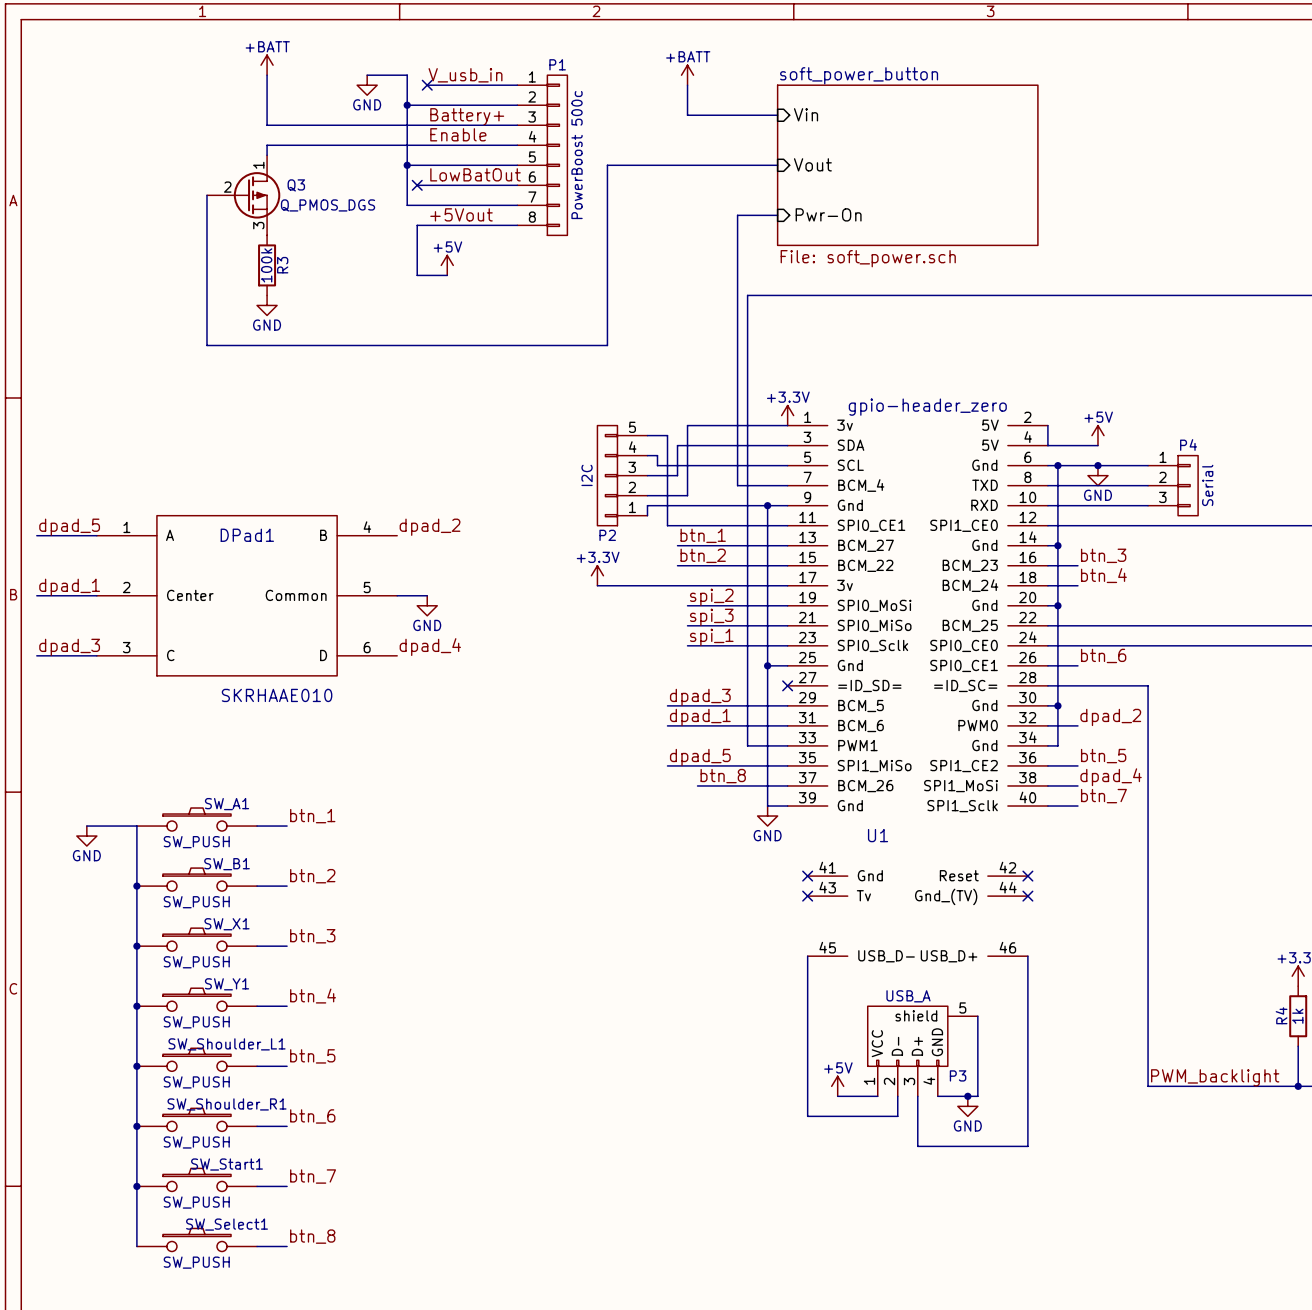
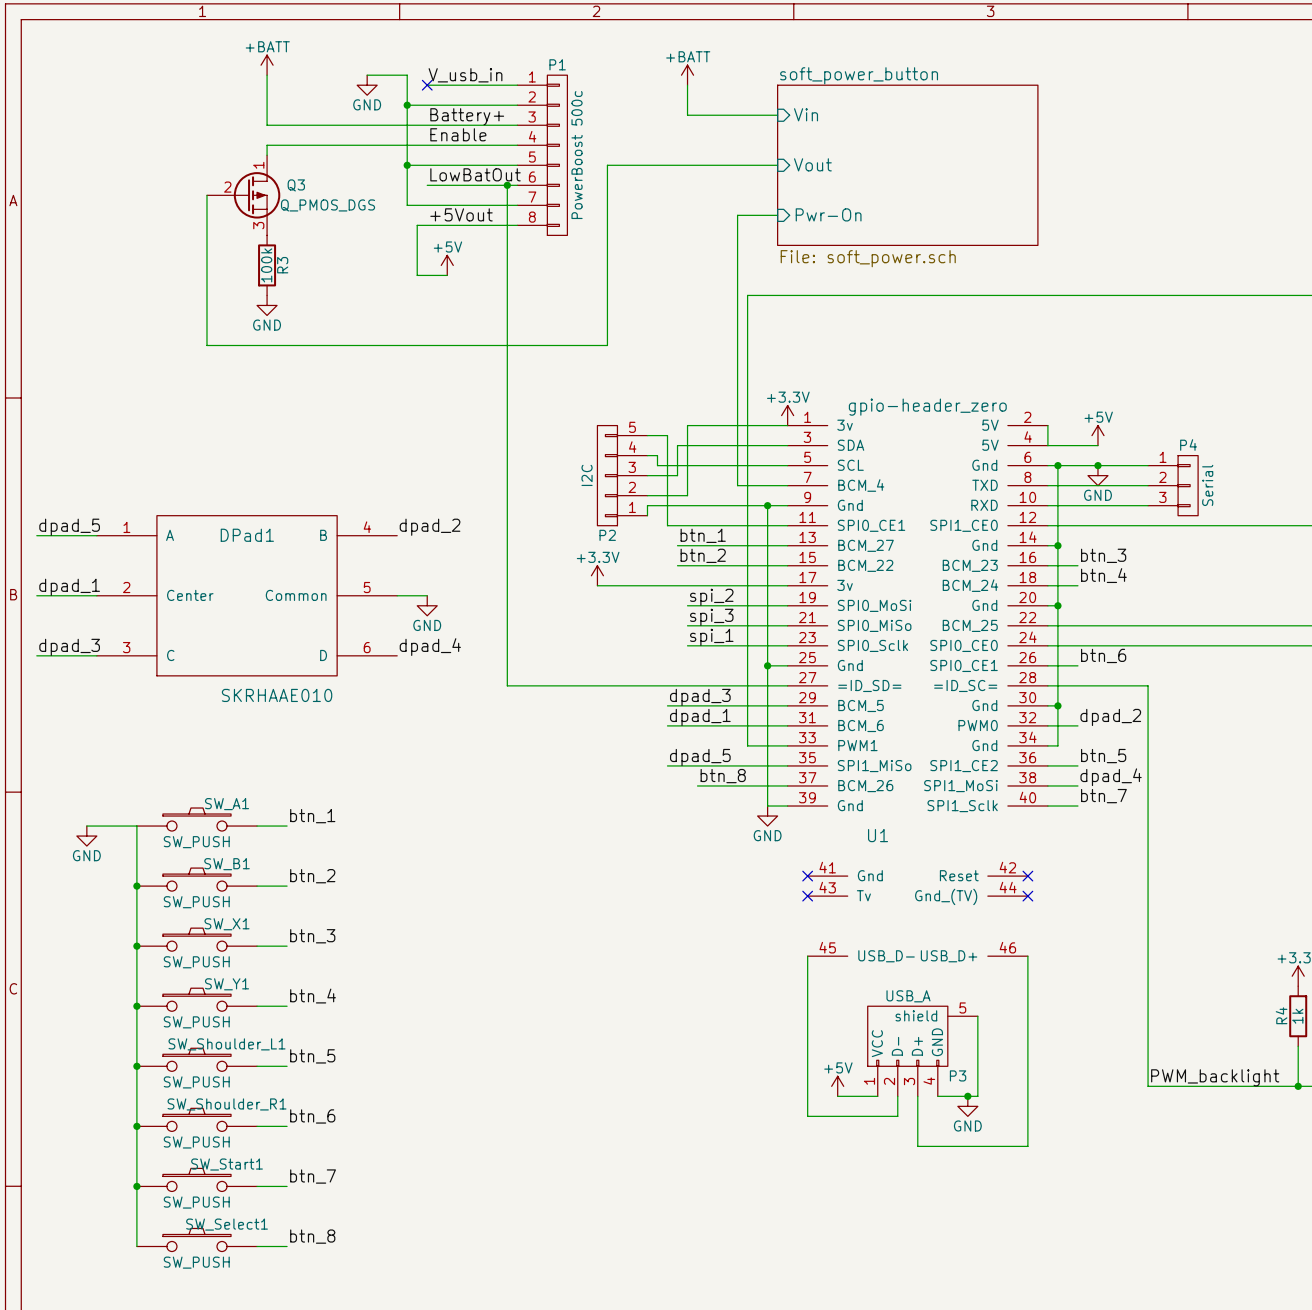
wire: (417, 185) (427, 185) -> none
no-connect mark: (417, 185) -> none
wire: none -> (507, 185) (507, 685) (787, 685)
junction: none -> (507, 185)
no-connect mark: (787, 685) -> none

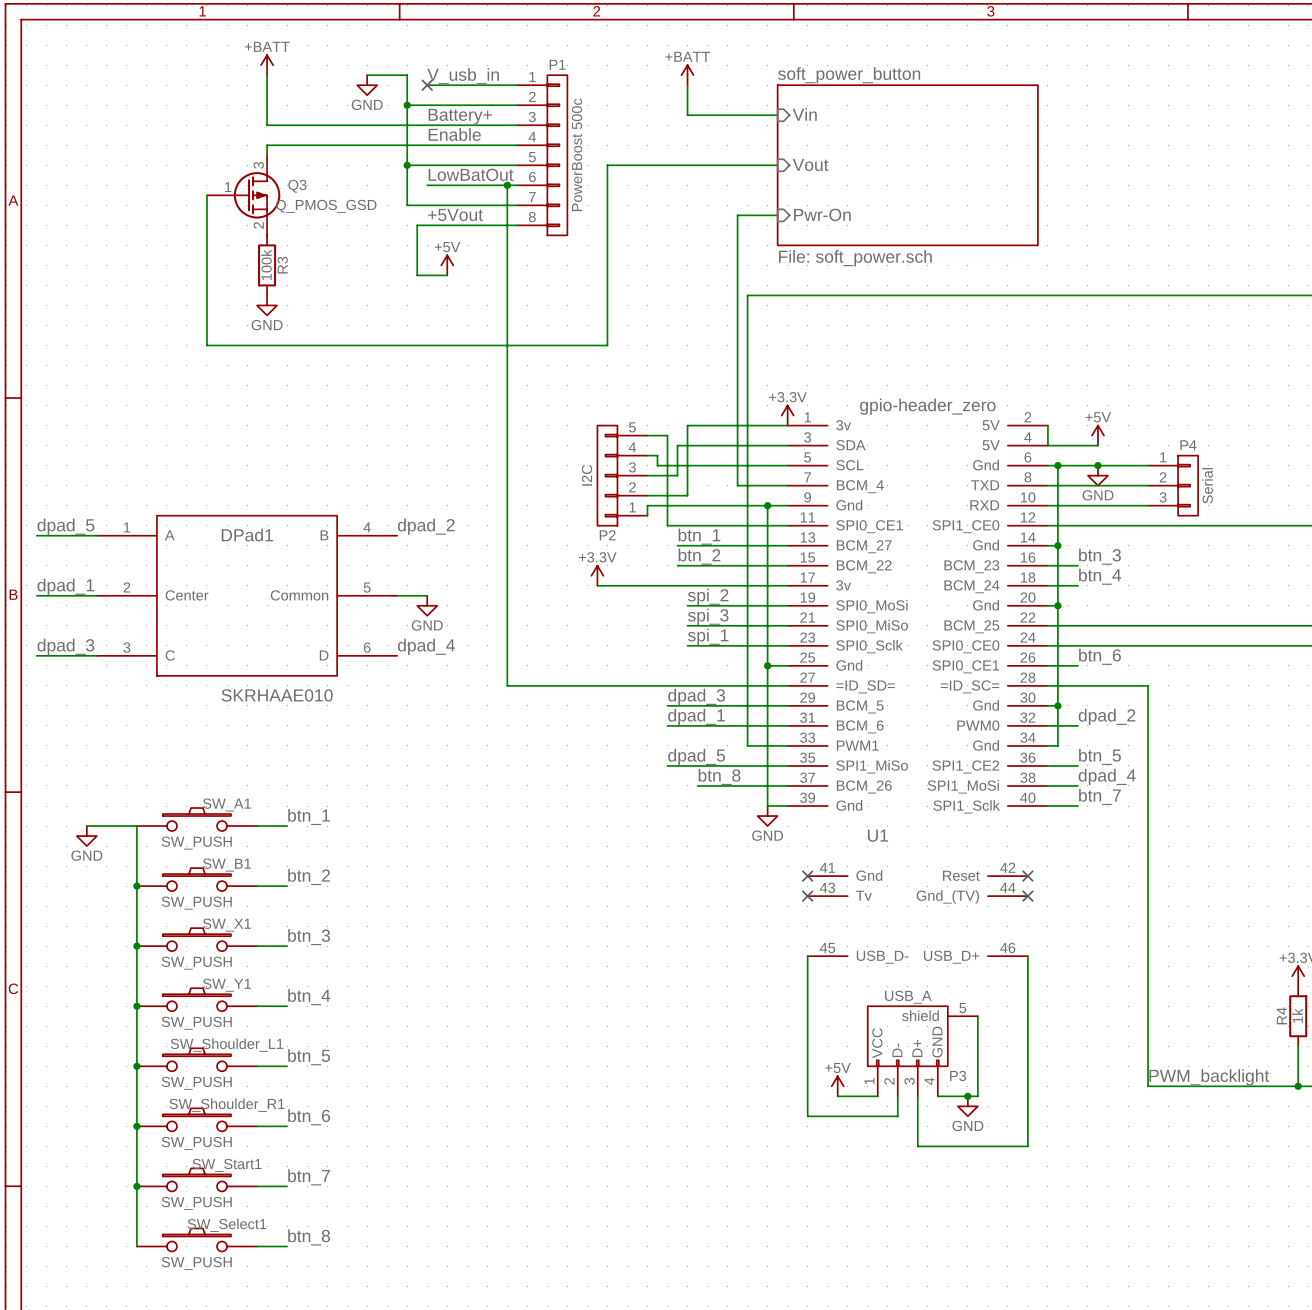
Q3 pin number: 1 (258, 165) -> 3 (258, 165)
Q3 pin number: 2 (227, 187) -> 1 (228, 187)
Q3 value: Q_PMOS_DGS (328, 205) -> Q_PMOS_GSD (326, 206)
Q3 pin number: 3 (258, 225) -> 2 (258, 225)

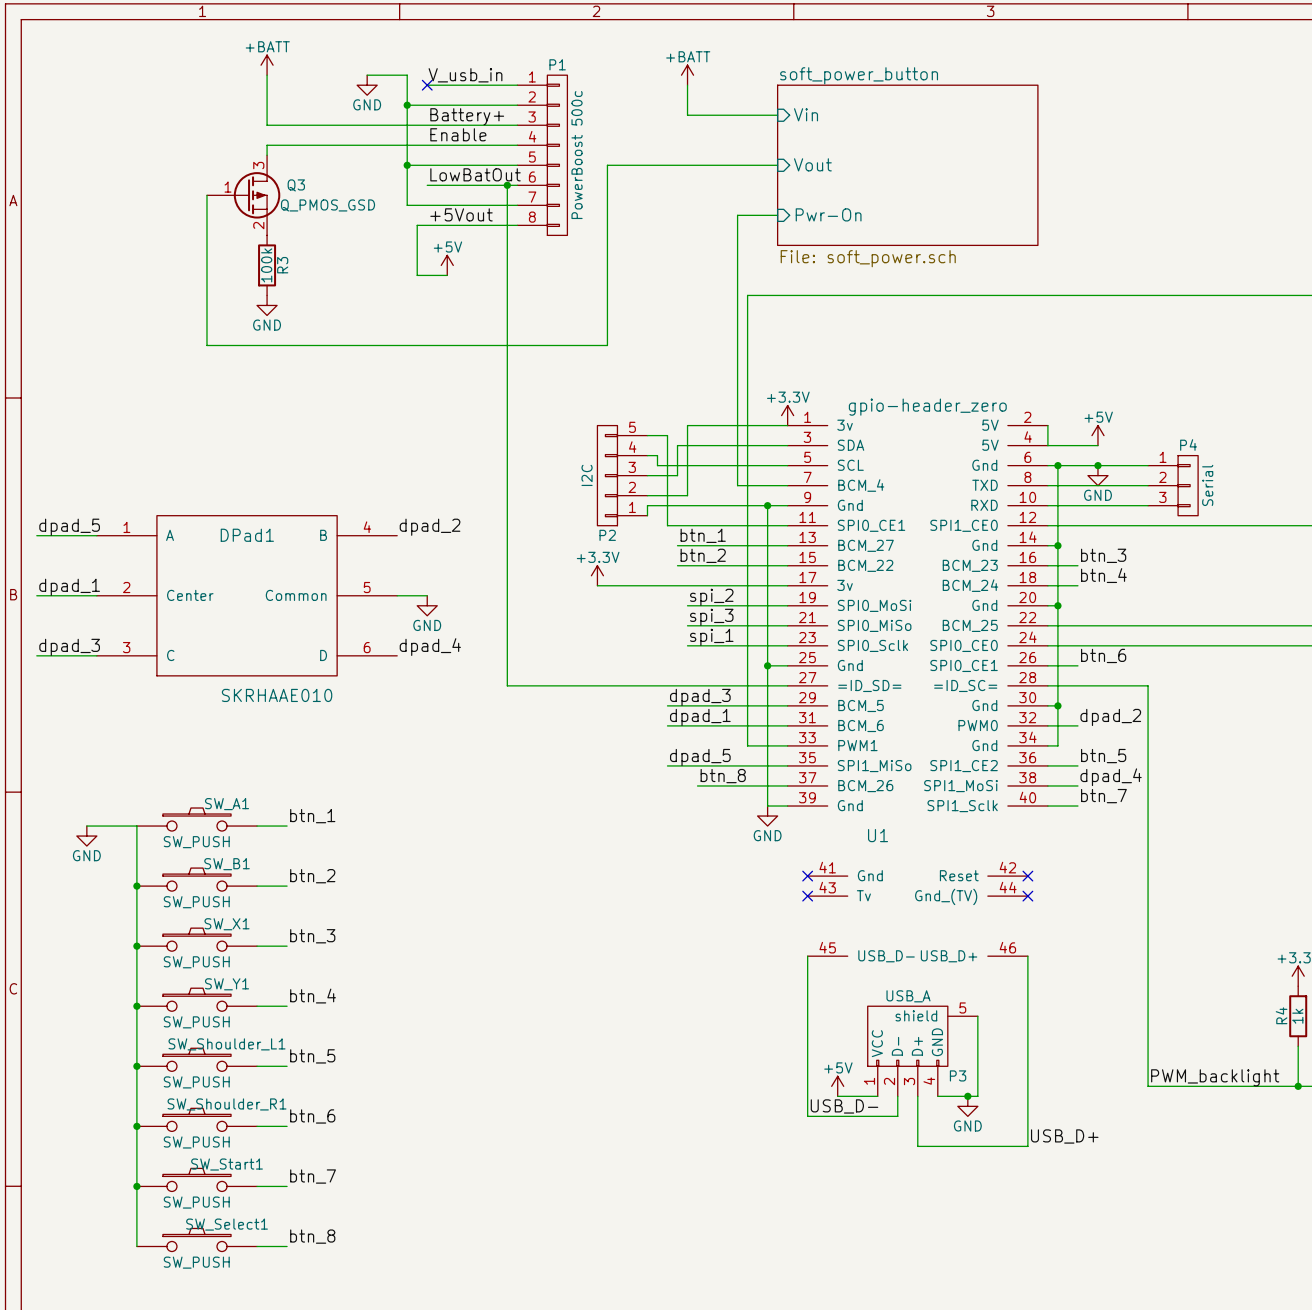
label: none -> USB_D- (844, 1106)
label: none -> USB_D+ (1064, 1136)

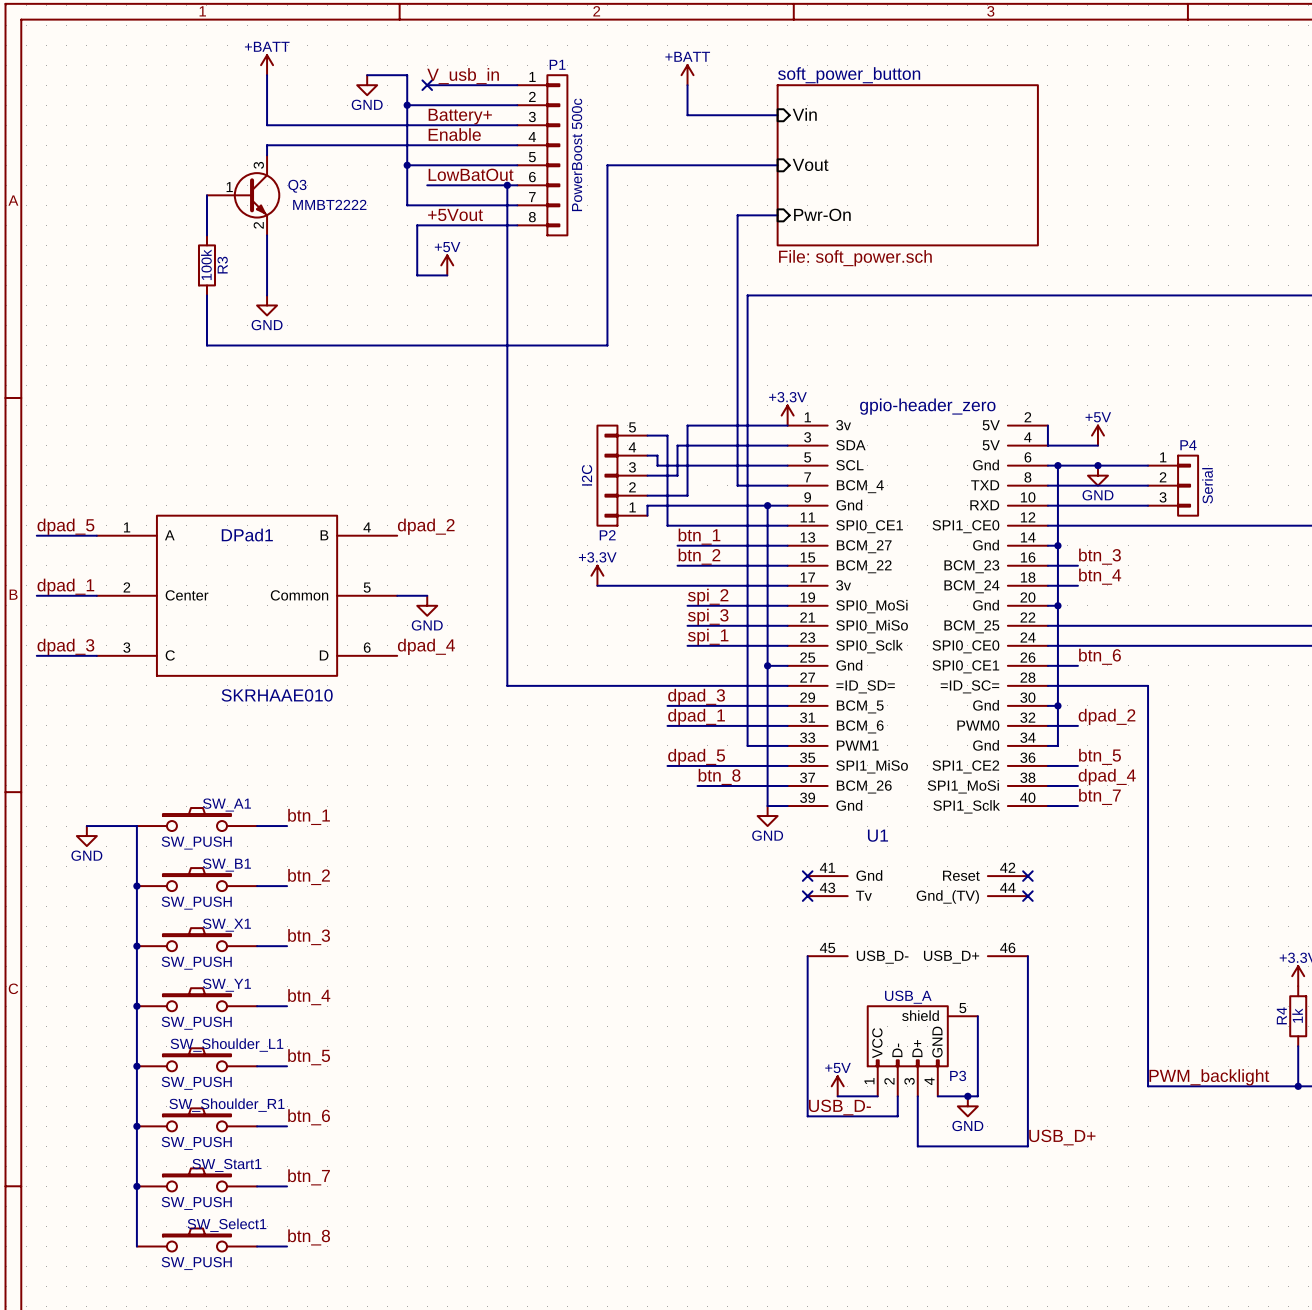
Q3 symbol: [206, 155, 281, 236] -> [206, 155, 281, 236]
Q3 value: Q_PMOS_GSD (328, 205) -> MMBT2222 (329, 204)
R3 position: (267, 265) -> (206, 265)

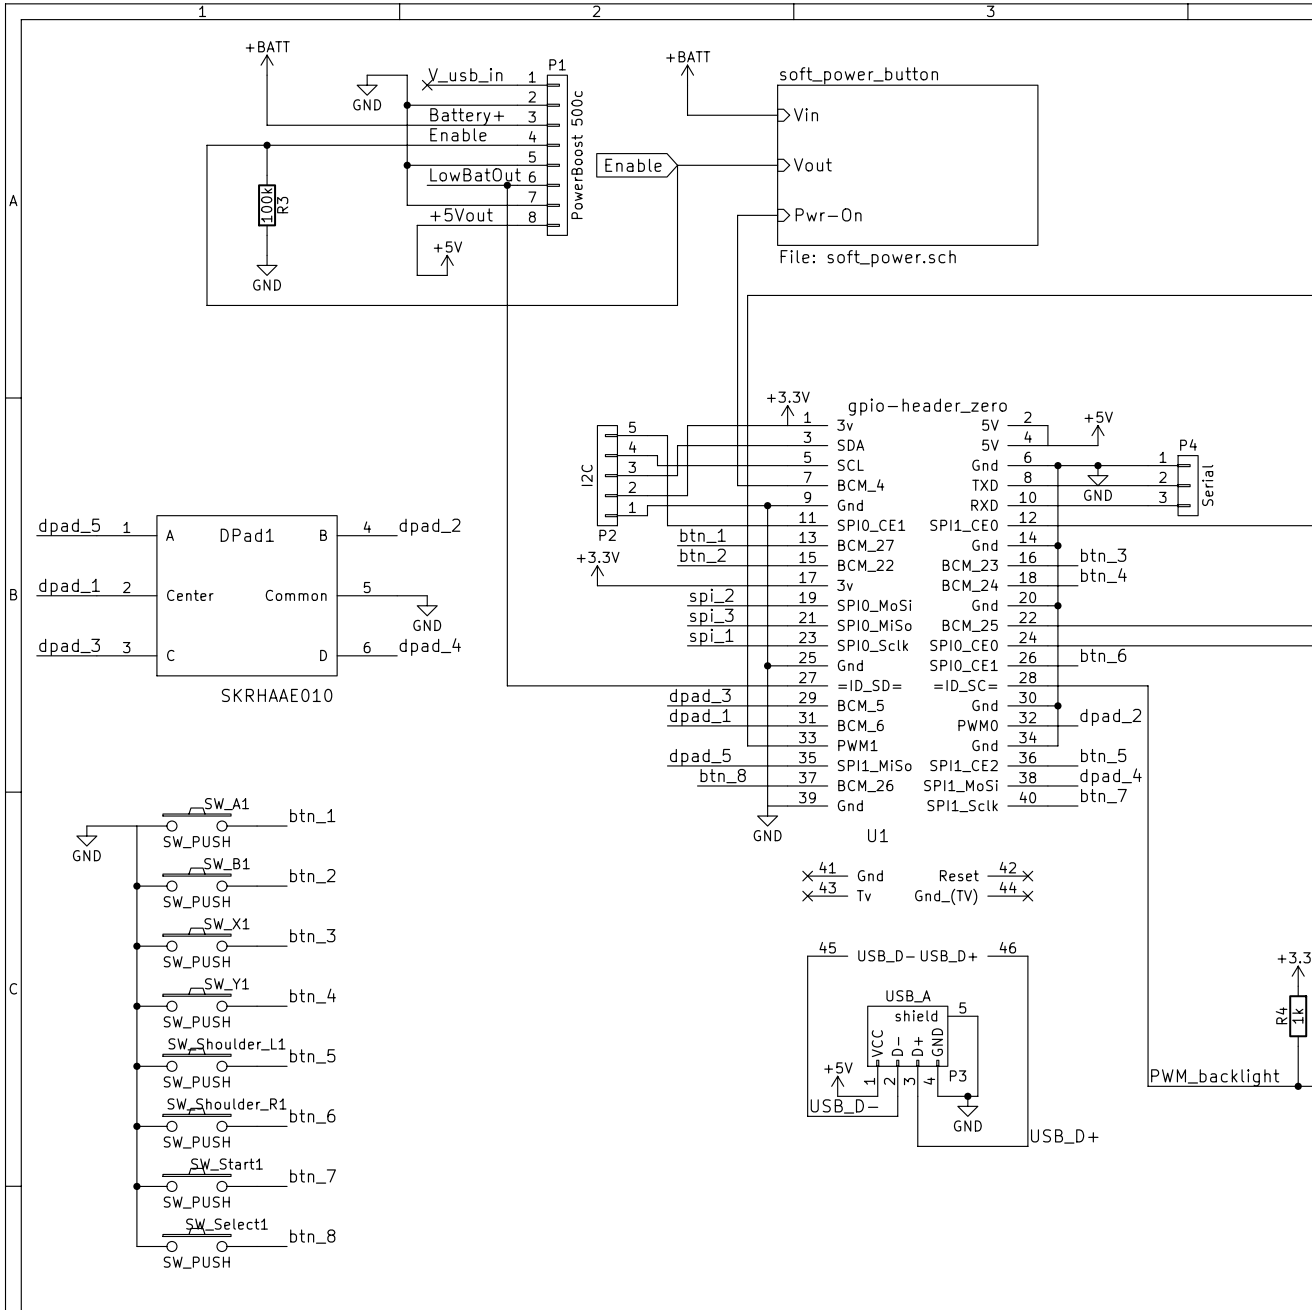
wire: none -> (267, 145) (206, 145) (206, 195)
junction: none -> (267, 145)
global label: none -> Enable (633, 165)
wire: (677, 165) (607, 165) (607, 345) (206, 345) (206, 305) -> (677, 165) (677, 305) (206, 305)
Q3: MMBT2222 (243, 195) -> none
wire: none -> (206, 235) (206, 295)
wire: (267, 255) (267, 295) -> none
R3 position: (206, 265) -> (267, 205)
power symbol position: GND (267, 305) -> GND (267, 265)

